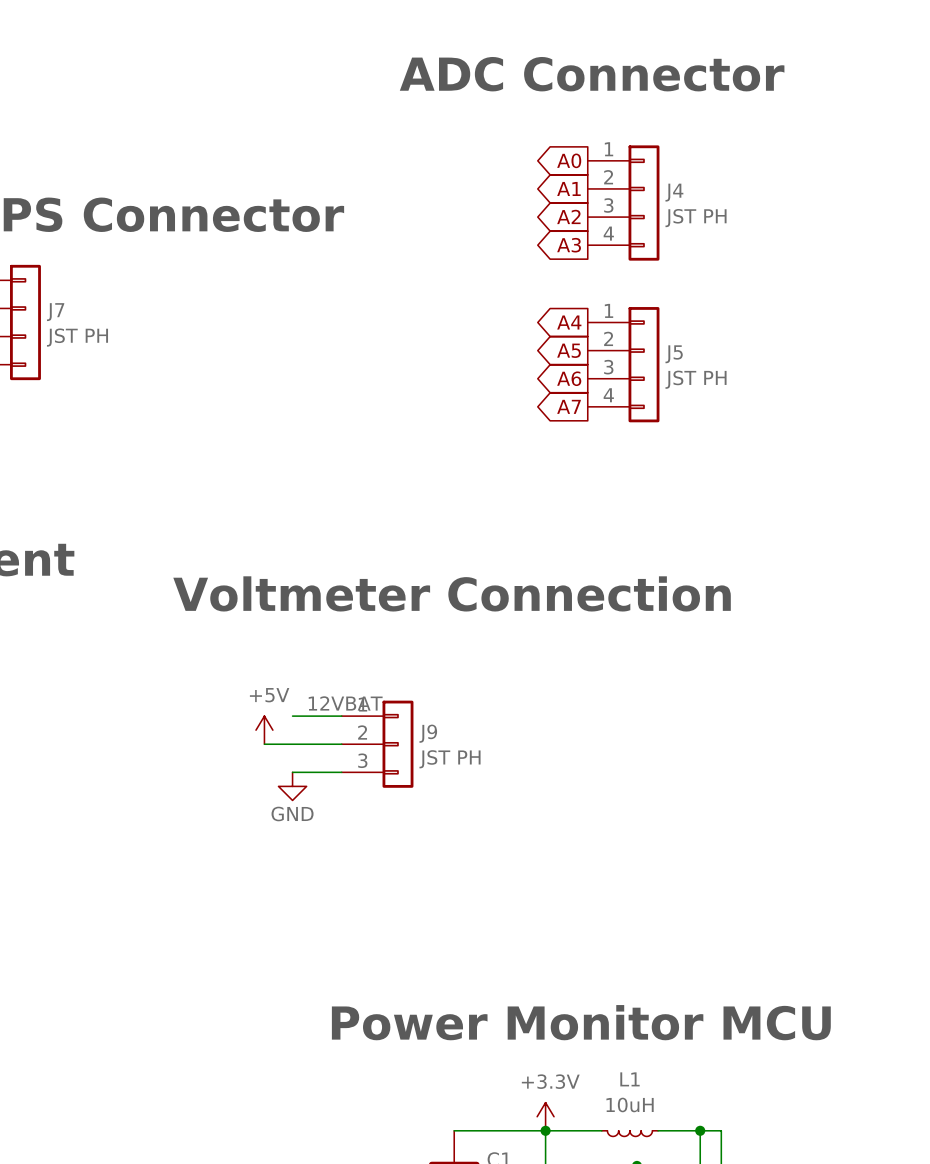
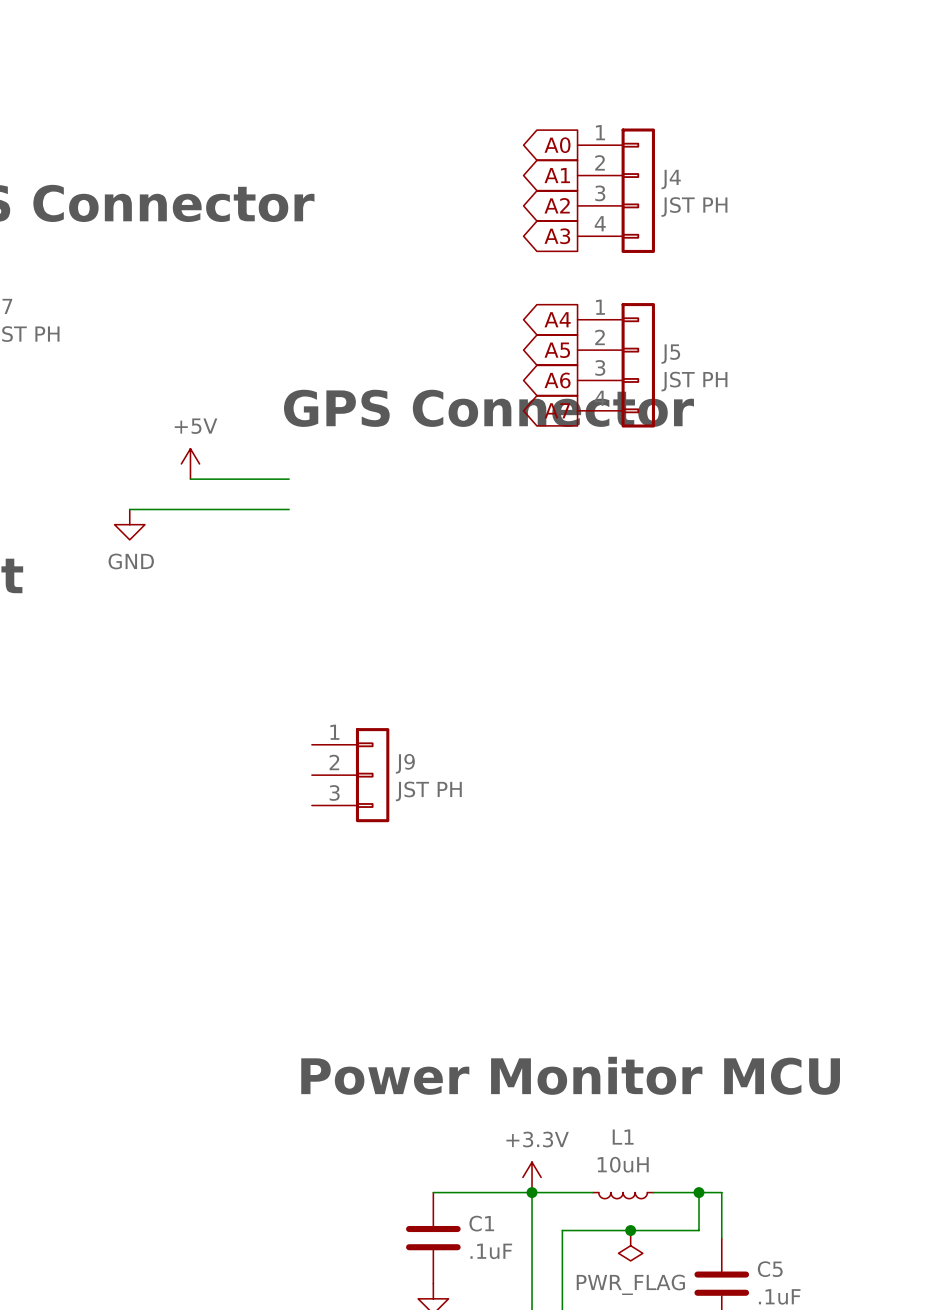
text: ADC Connector (592, 74) -> none
text: none -> GPS Connector (488, 408)
power symbol: none -> +5V (190, 463)
wire: none -> (190, 479) (289, 479)
wire: none -> (129, 509) (289, 509)
power symbol: none -> GND (129, 524)
text: Voltmeter Connection (452, 593) -> none
label: 12VBAT (345, 703) -> none
wire: (292, 716) (341, 716) -> none
power symbol: +5V (264, 730) -> none
wire: (264, 744) (341, 744) -> none
wire: (292, 772) (341, 772) -> none
power symbol: GND (292, 786) -> none

